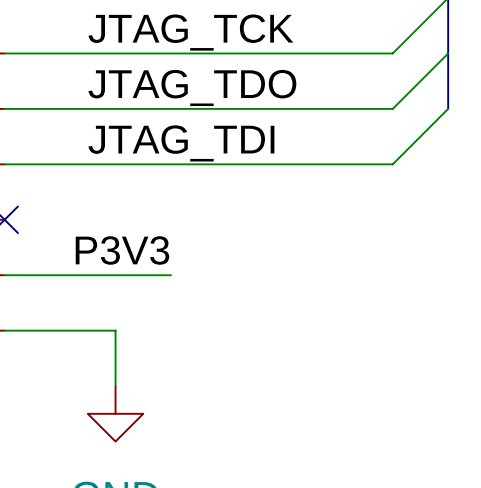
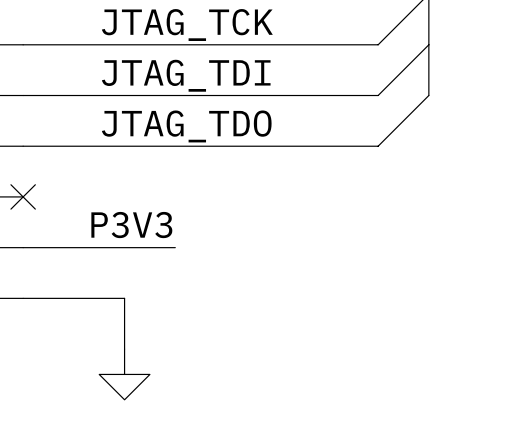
label: JTAG_TDO (192, 87) -> JTAG_TDI (186, 75)
label: JTAG_TDI (181, 143) -> JTAG_TDO (186, 126)

